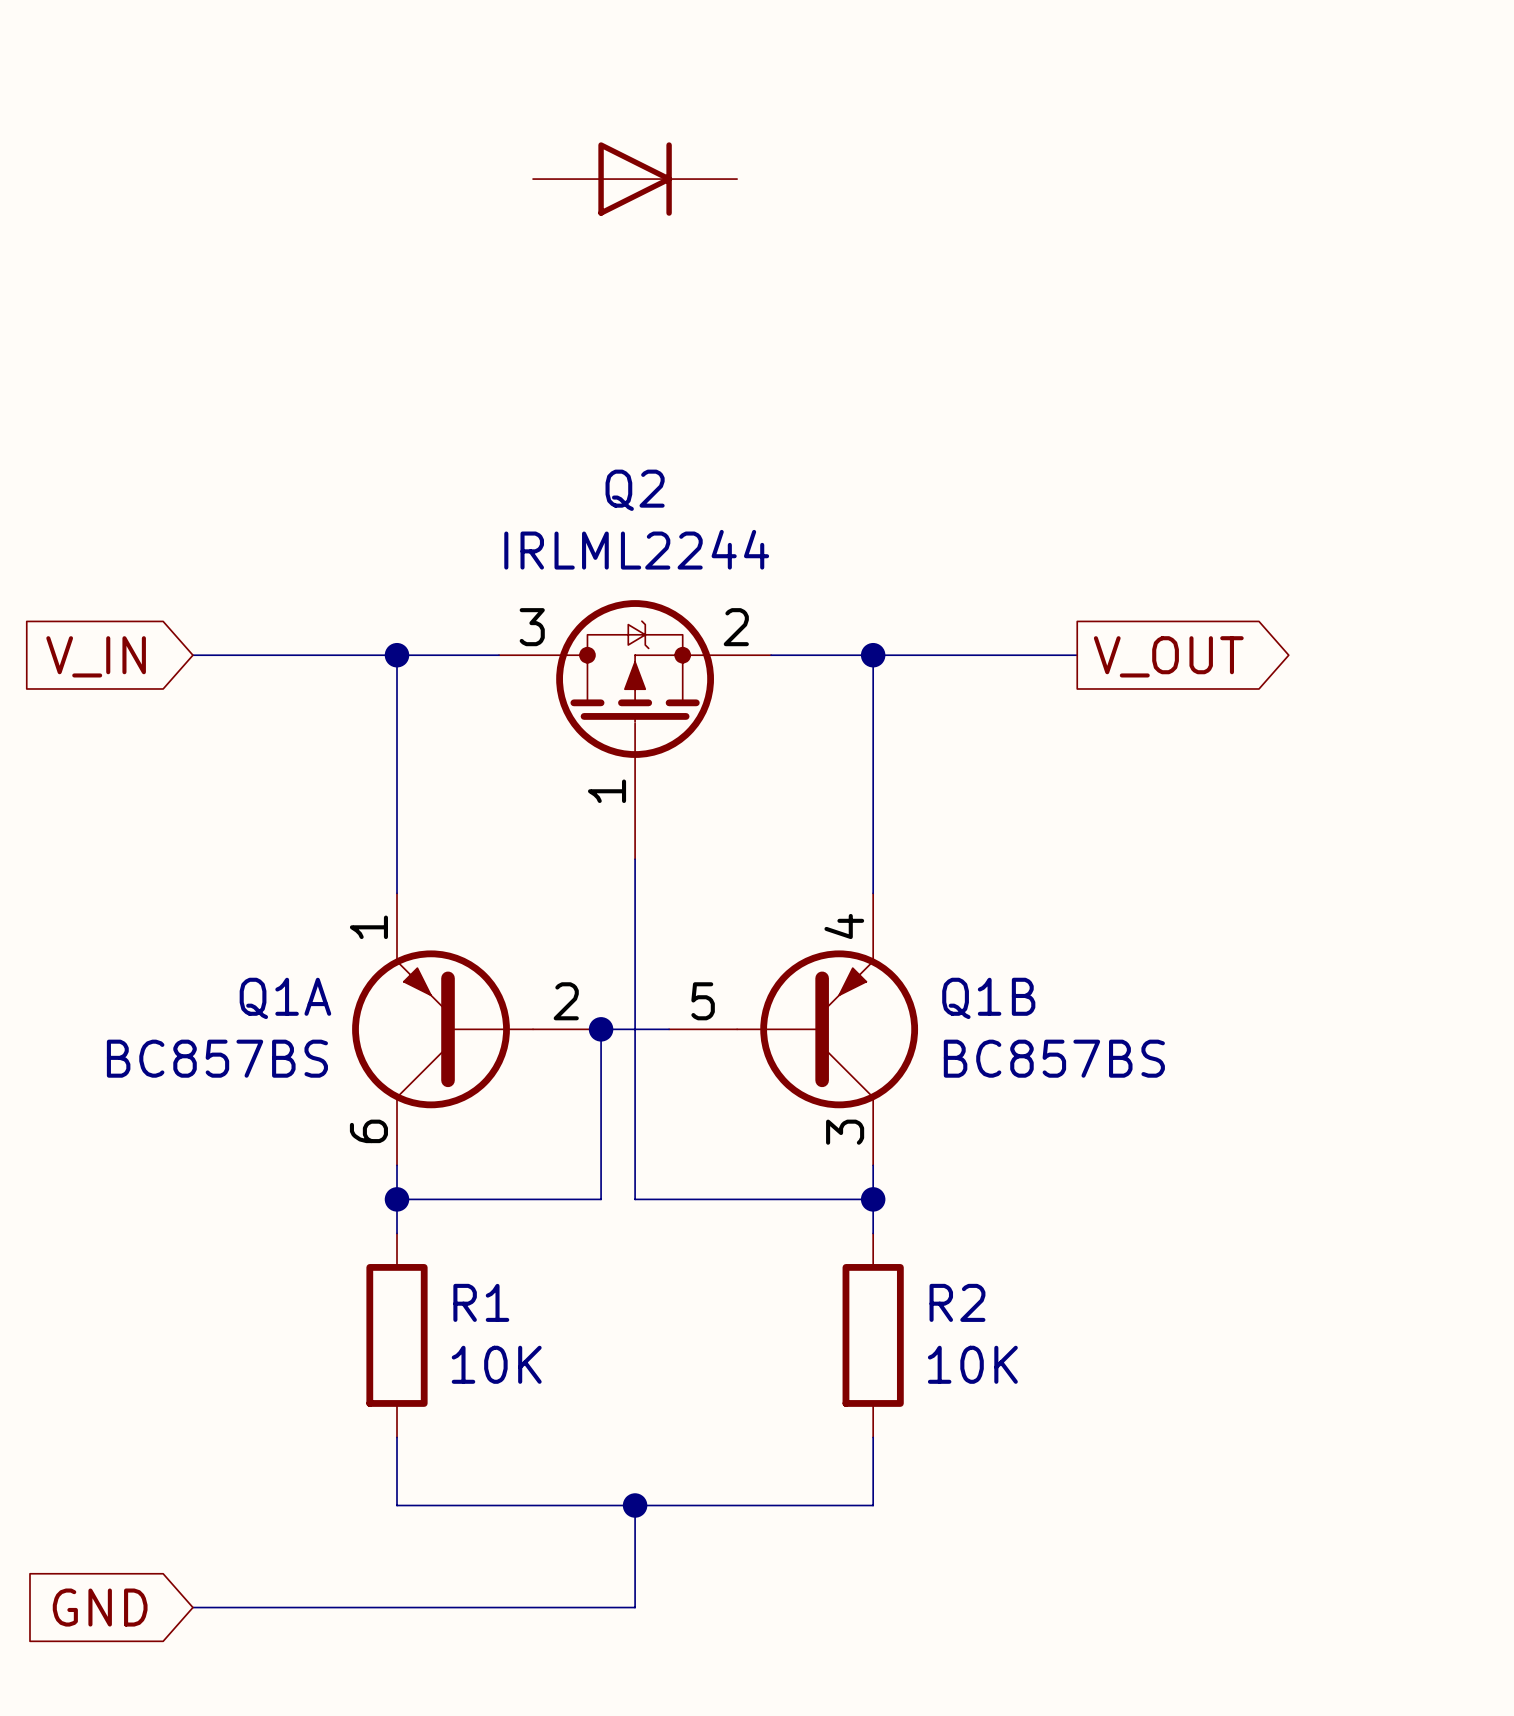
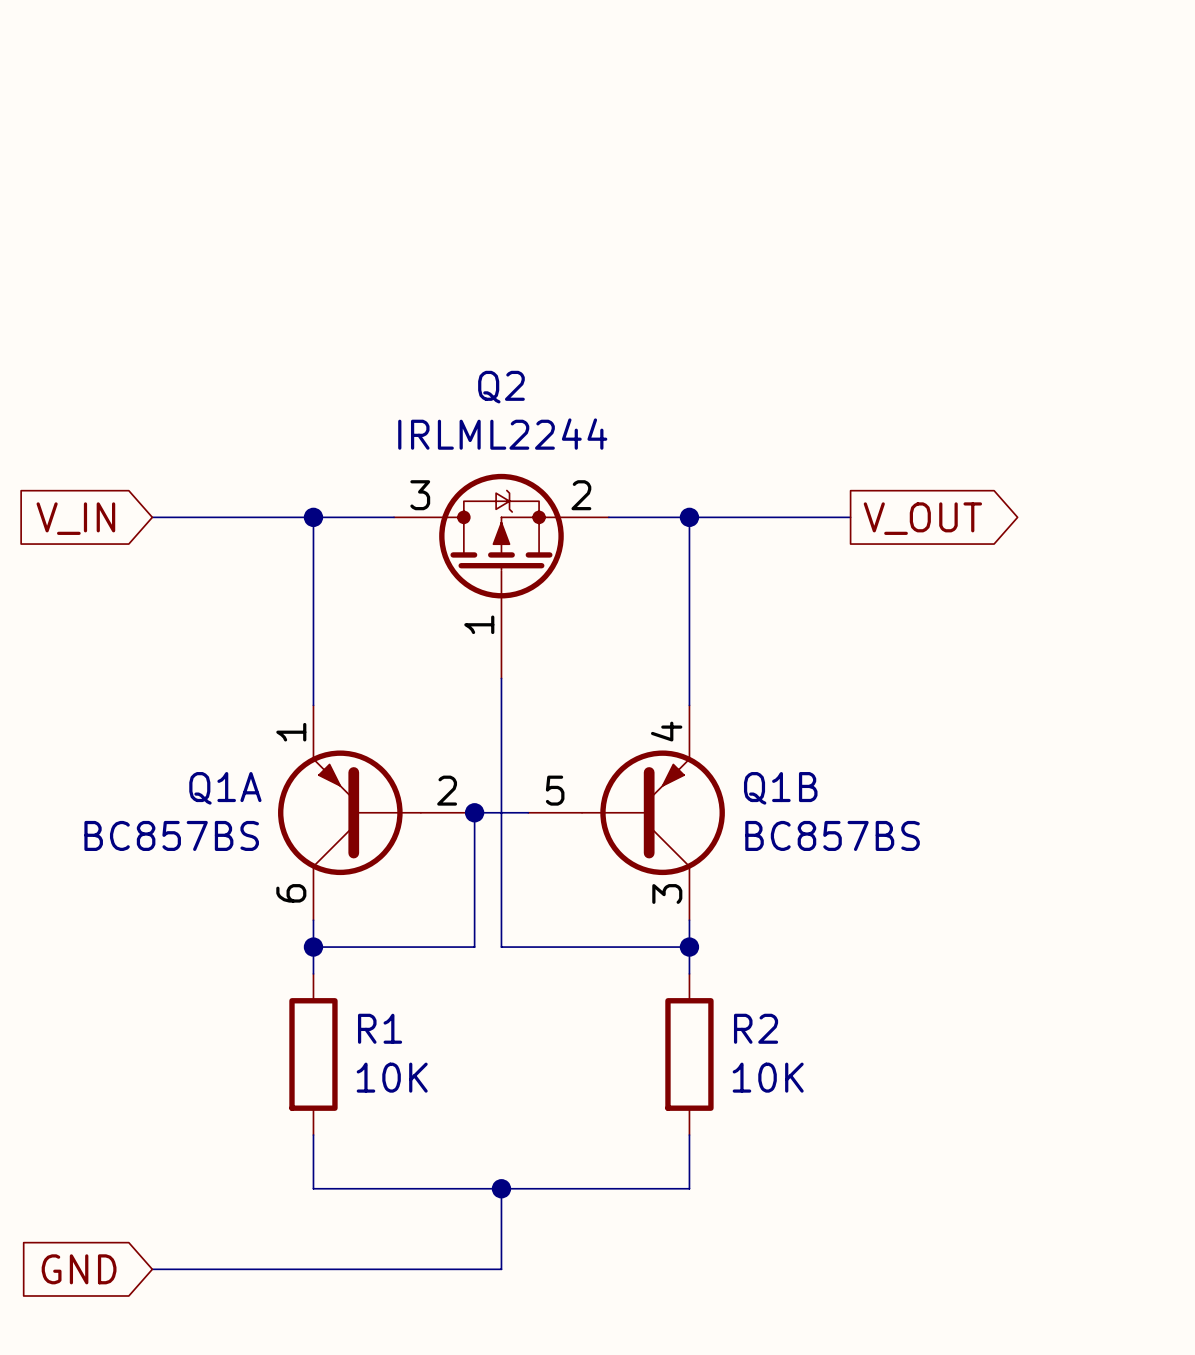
part: (635, 179) -> none

